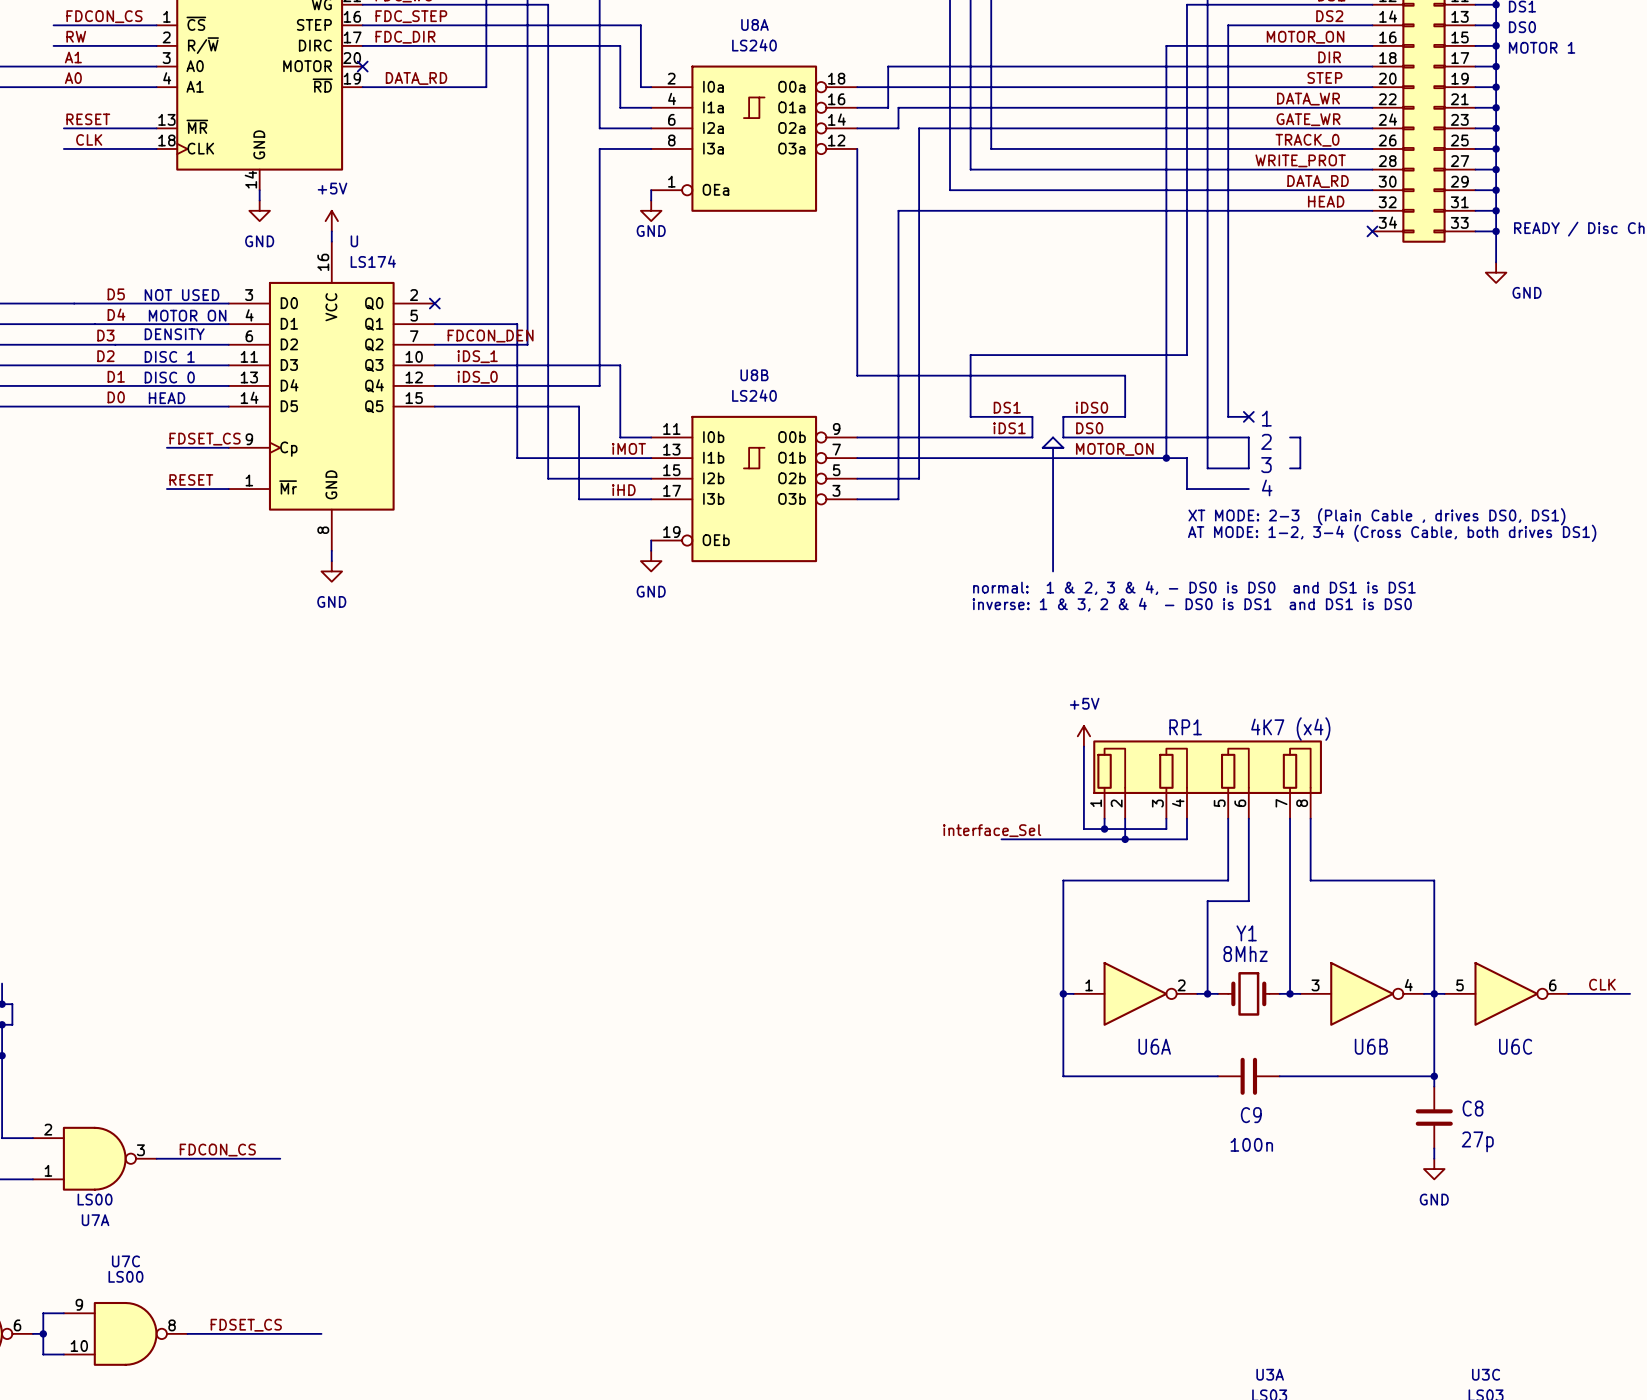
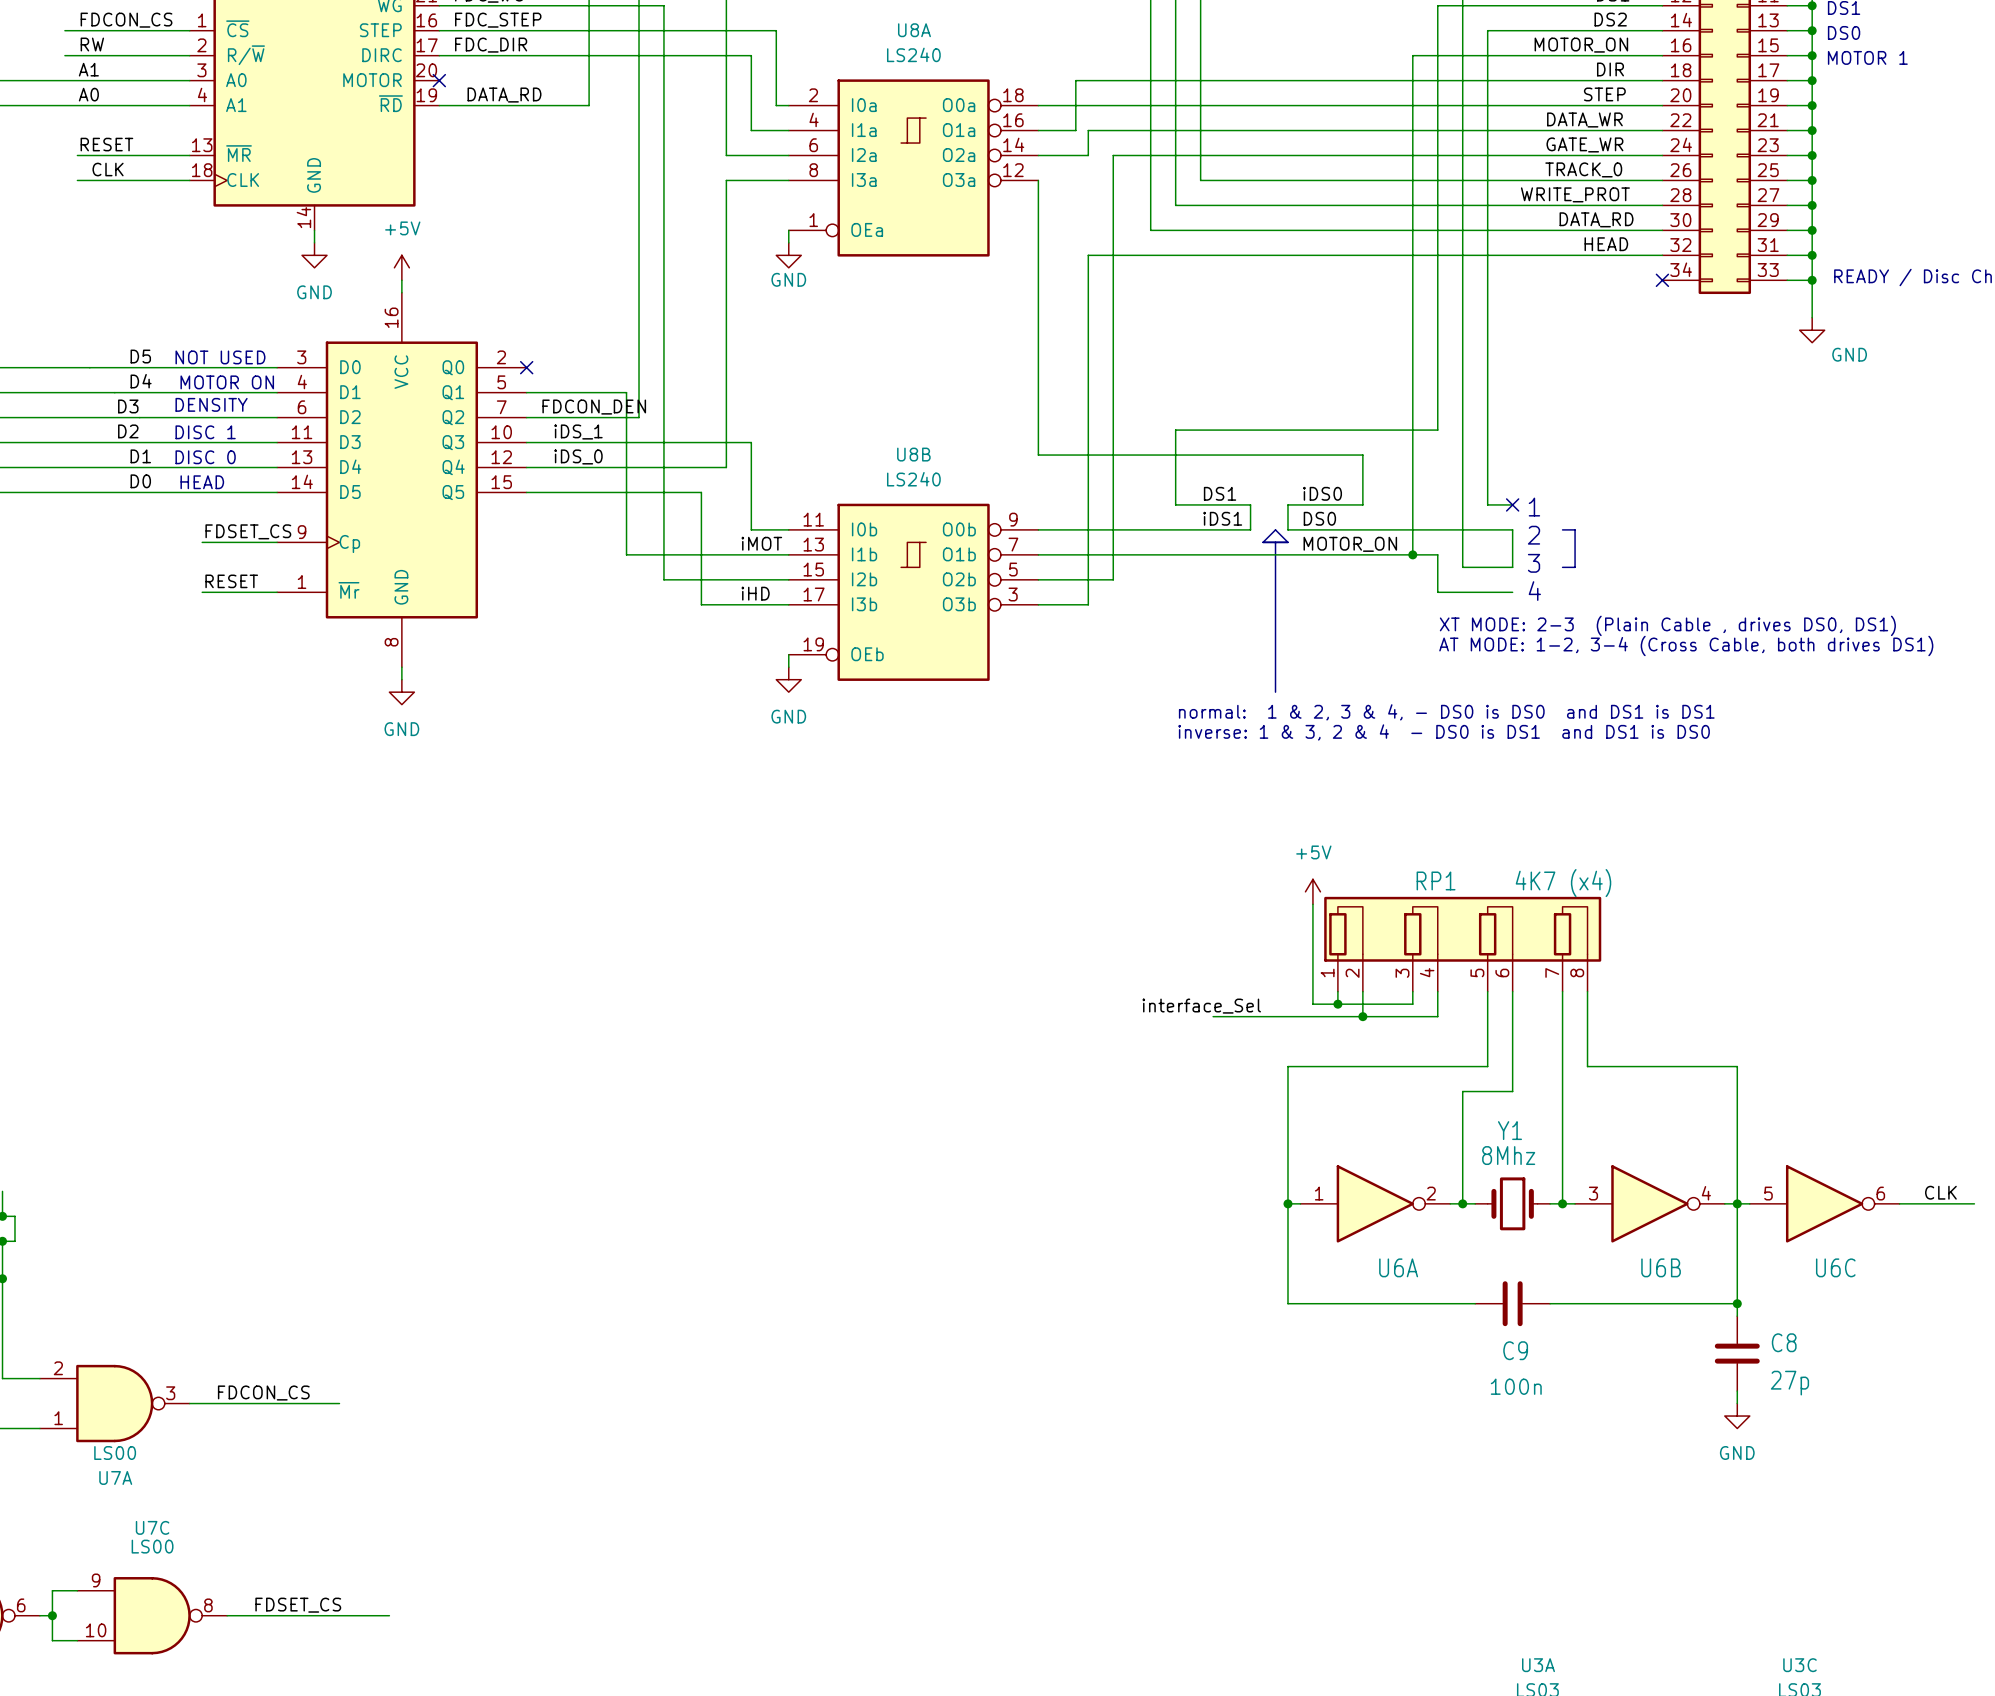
U name: U (354, 241) -> none
U value: LS174 (373, 261) -> none

